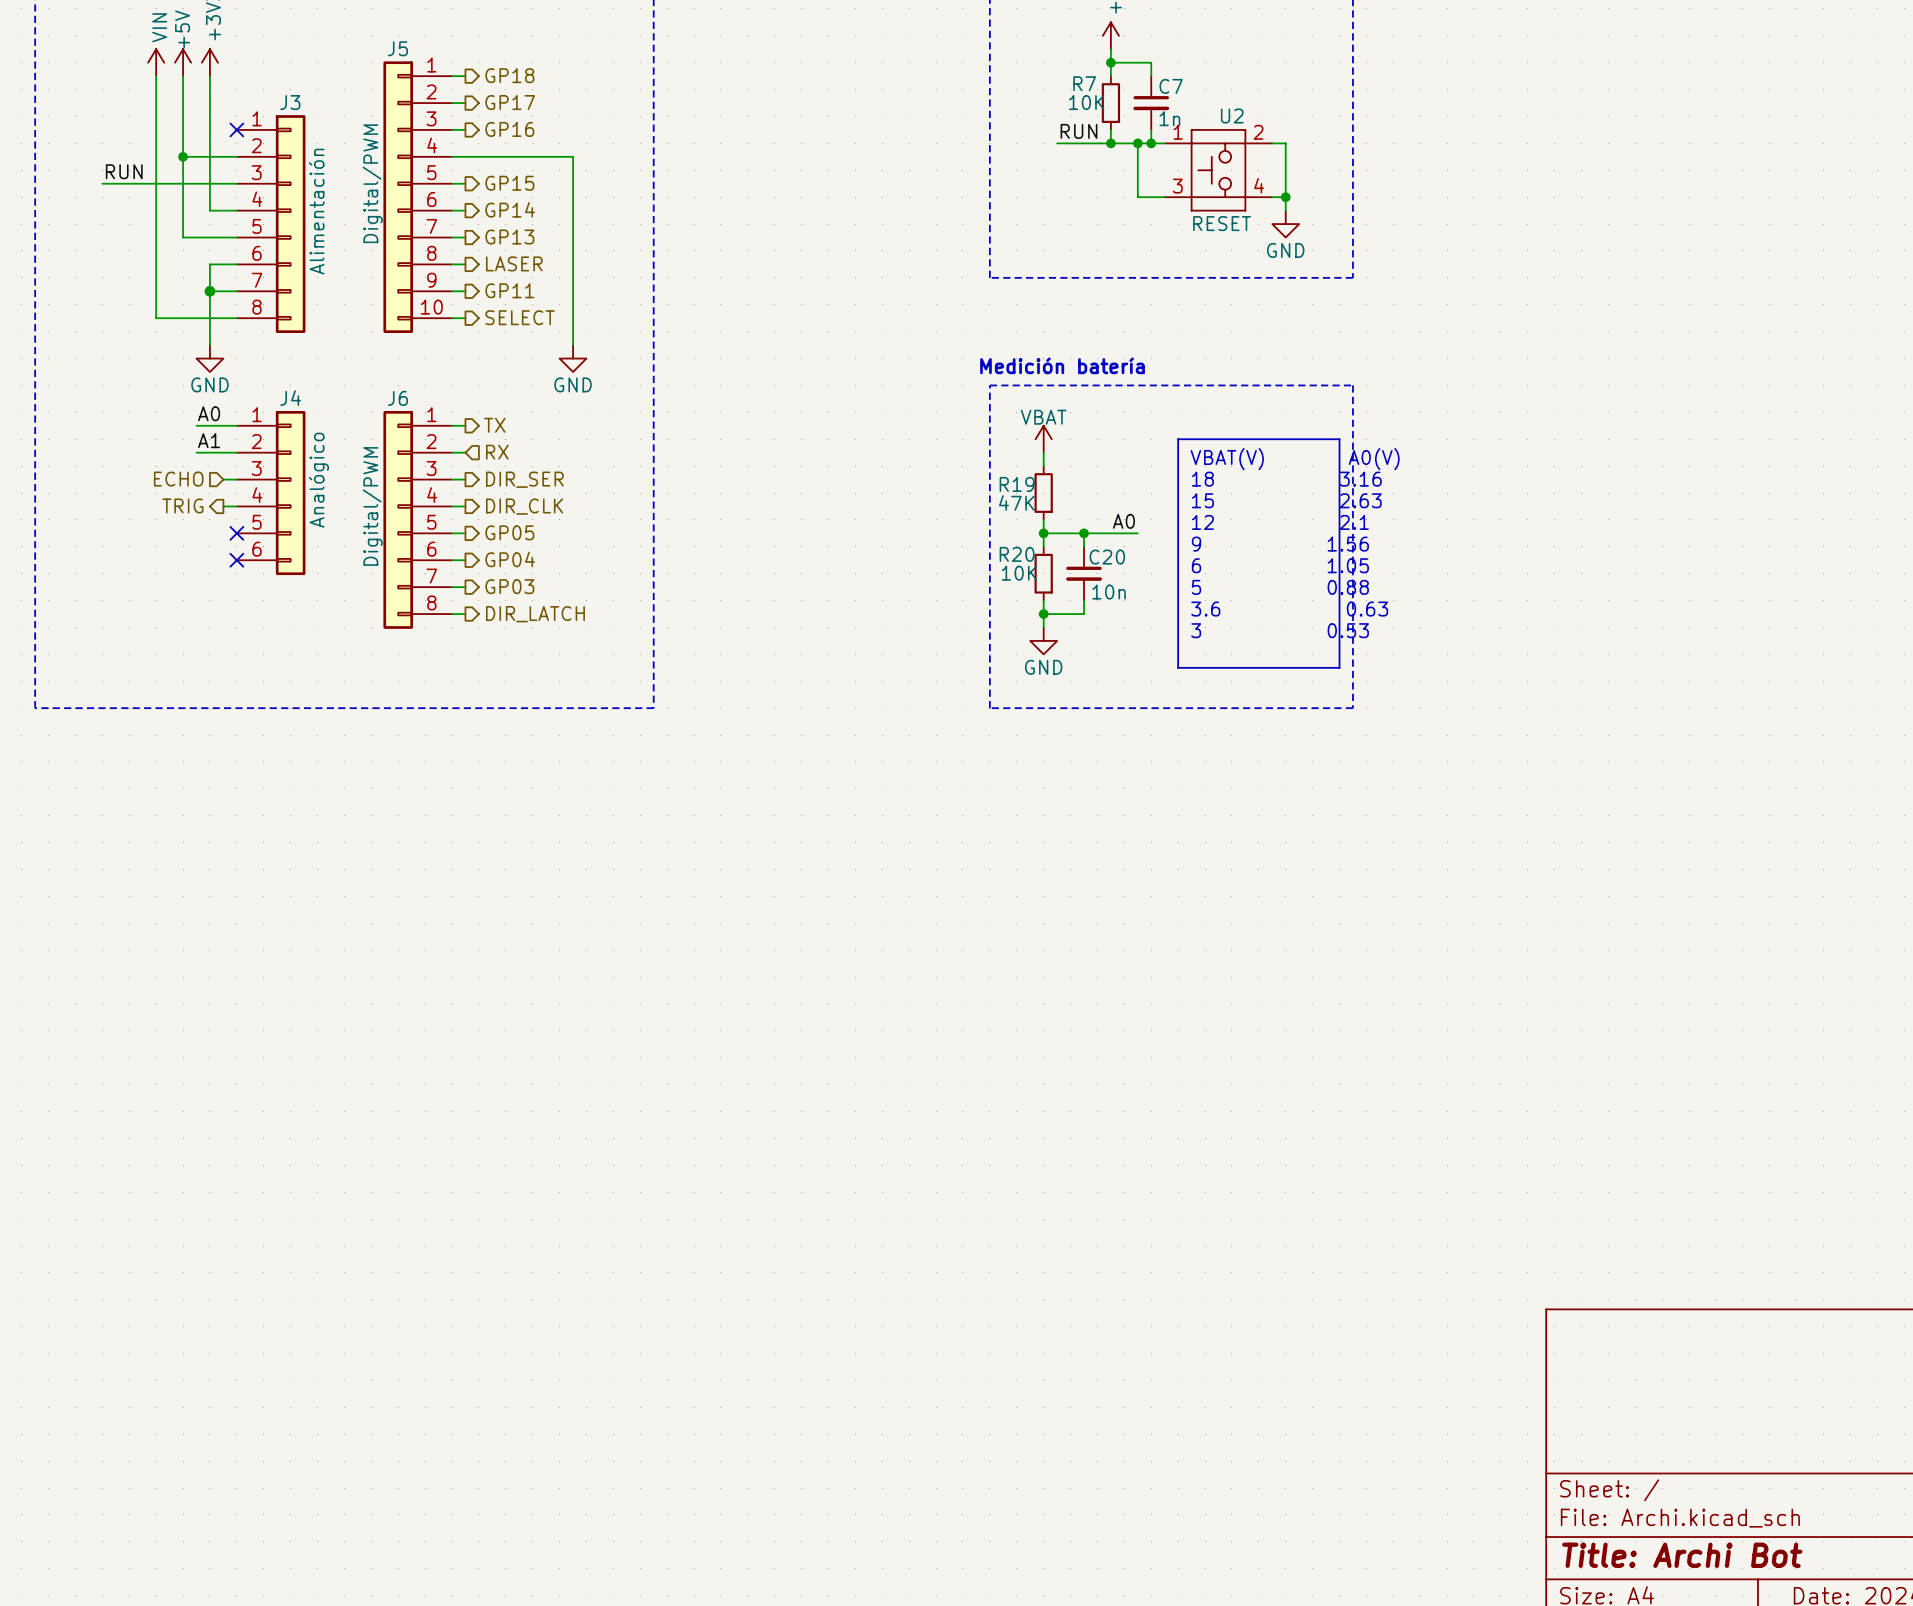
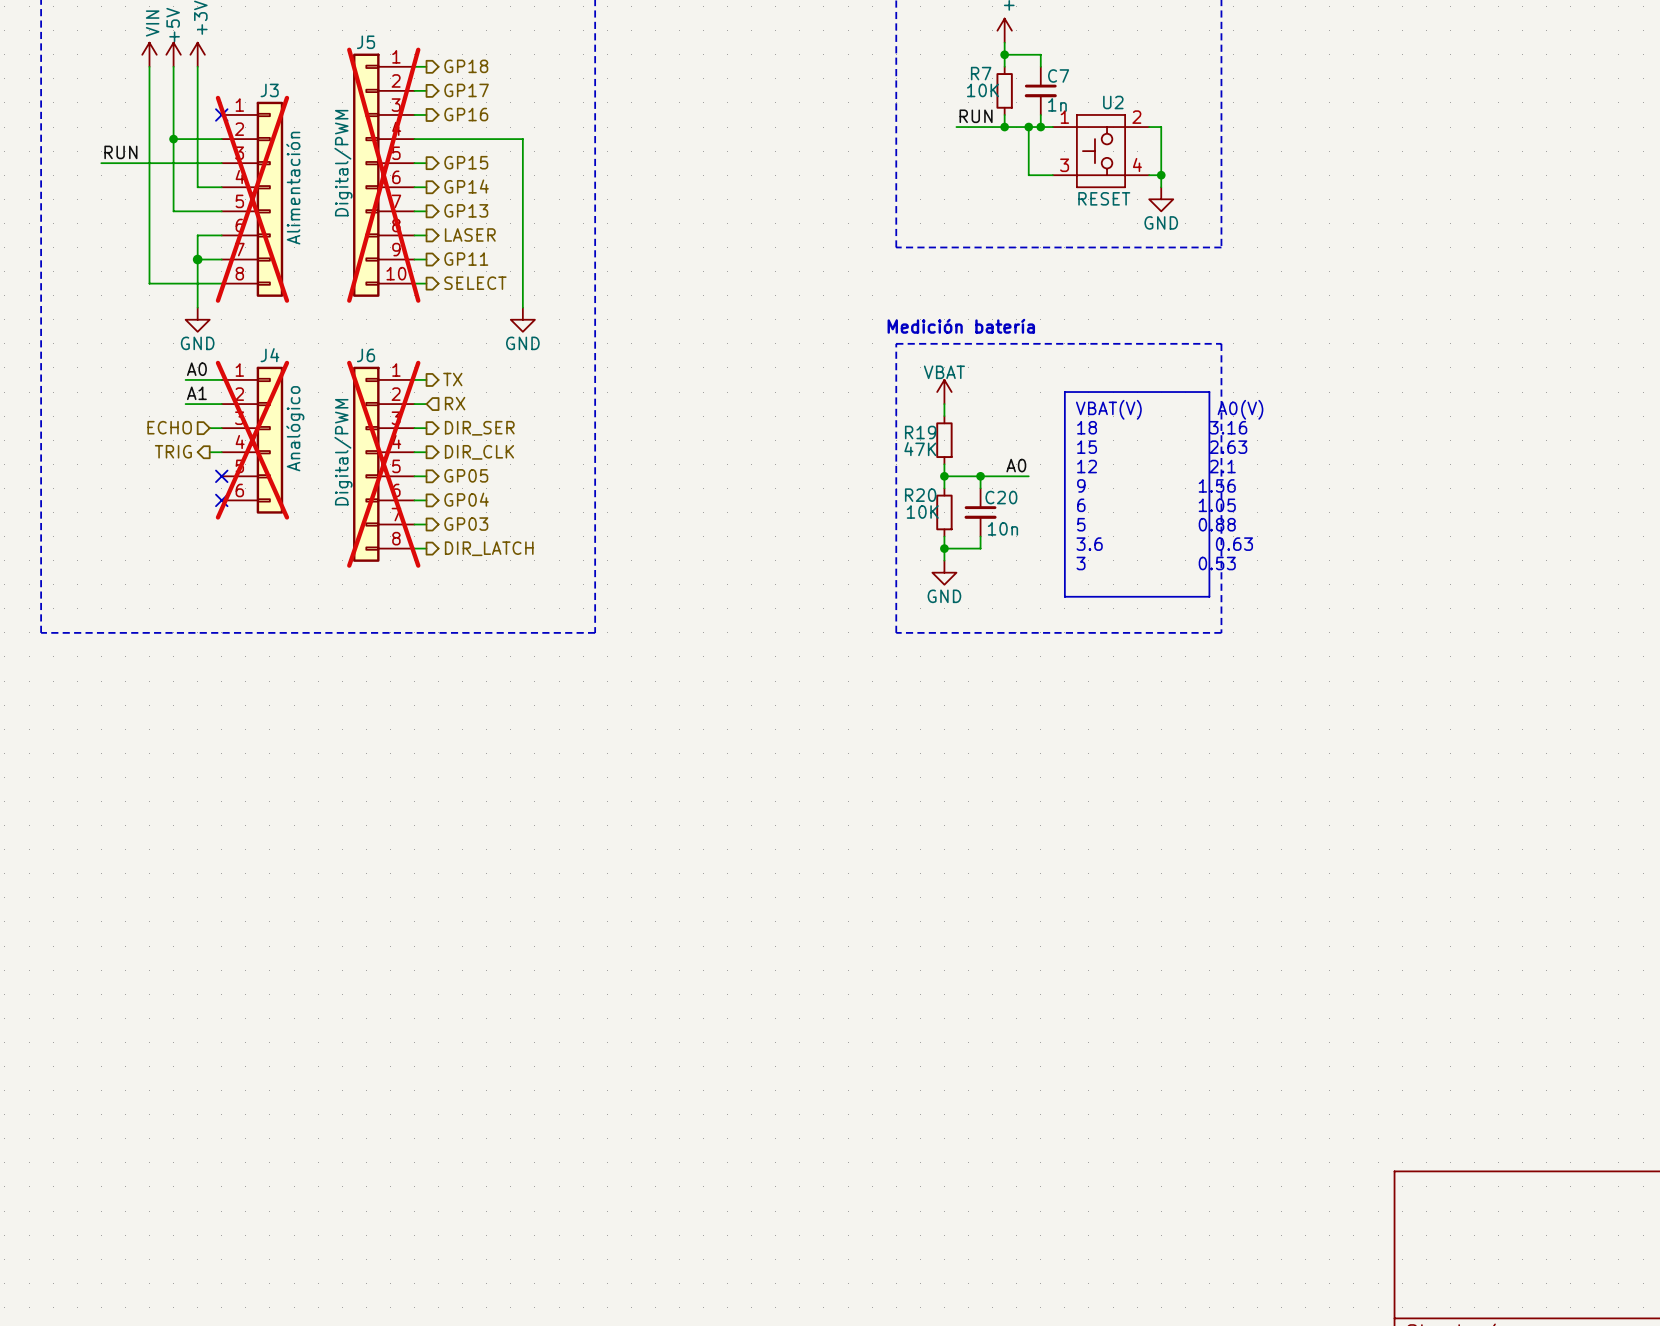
J5 do-not-place cross: none -> (383, 175)
J3 do-not-place cross: none -> (252, 199)
J4 do-not-place cross: none -> (252, 440)
J6 do-not-place cross: none -> (383, 464)

